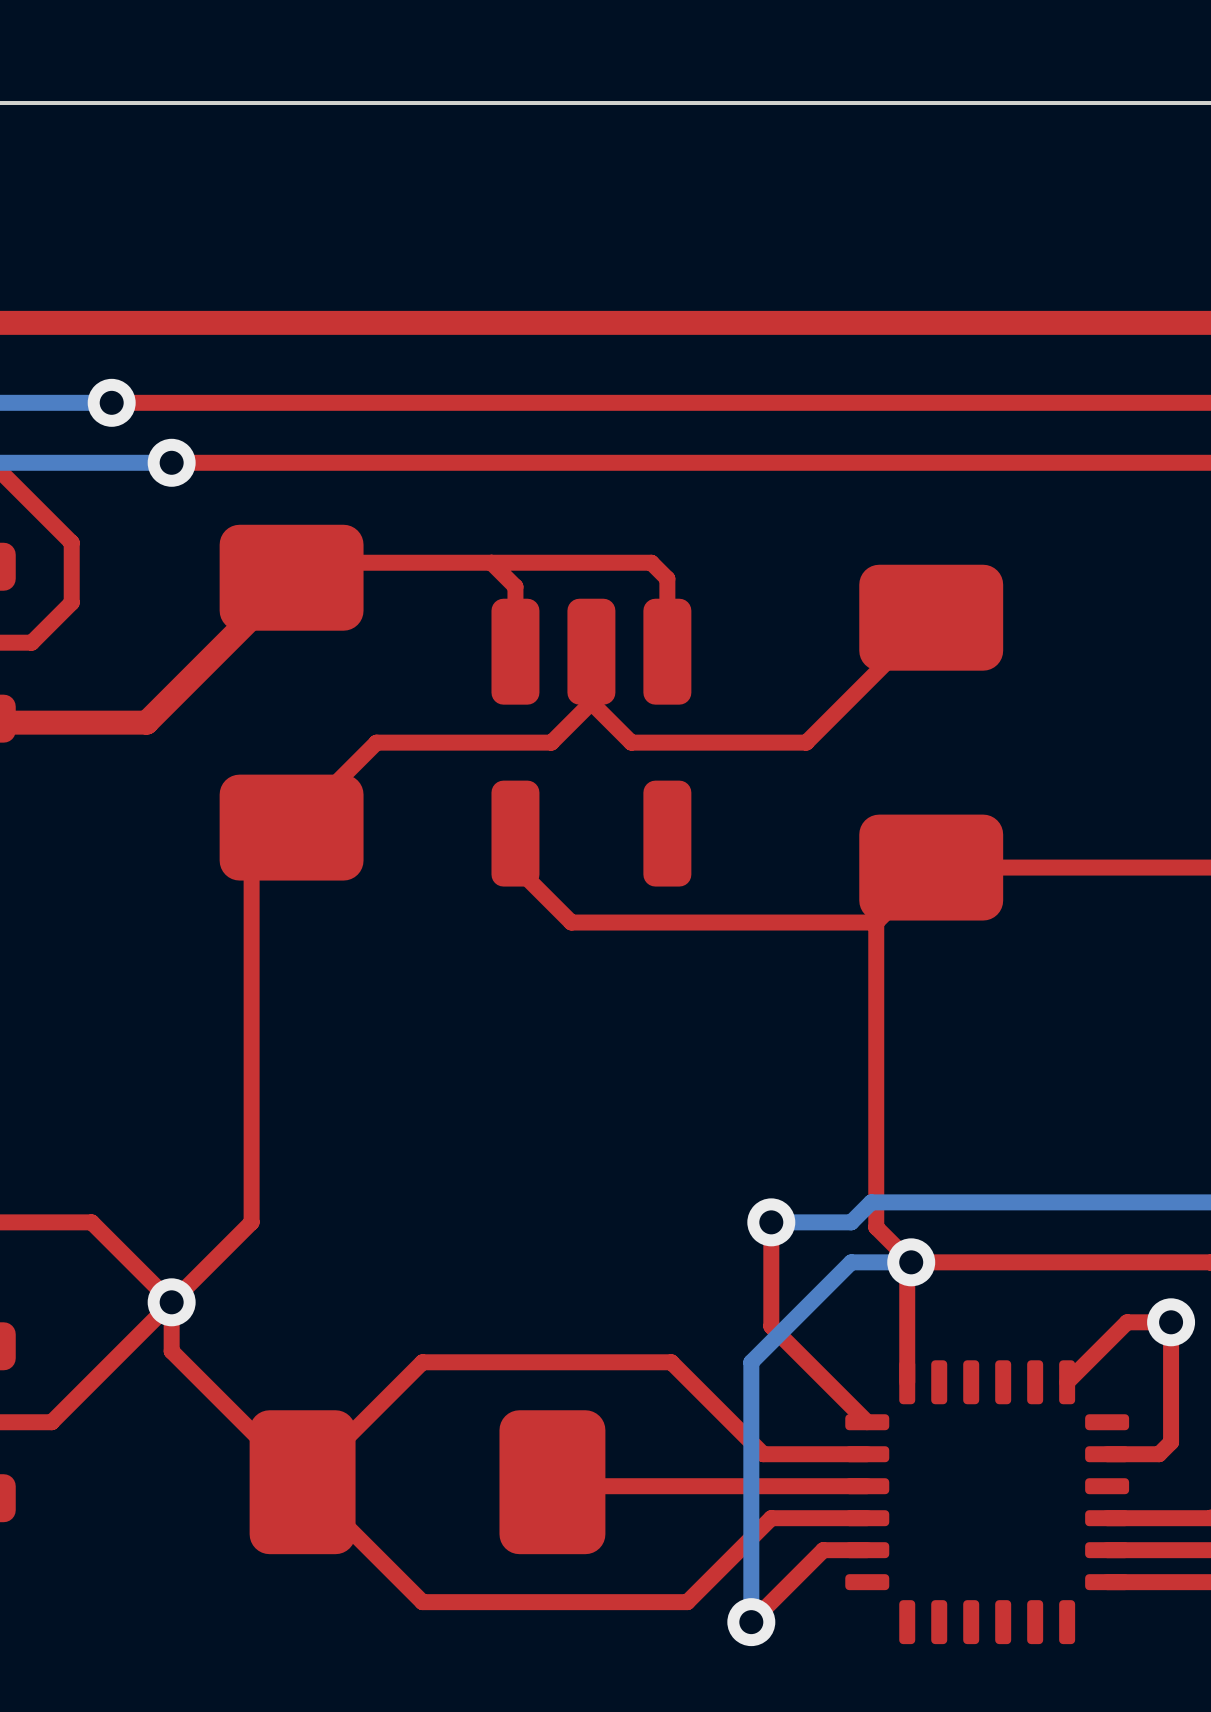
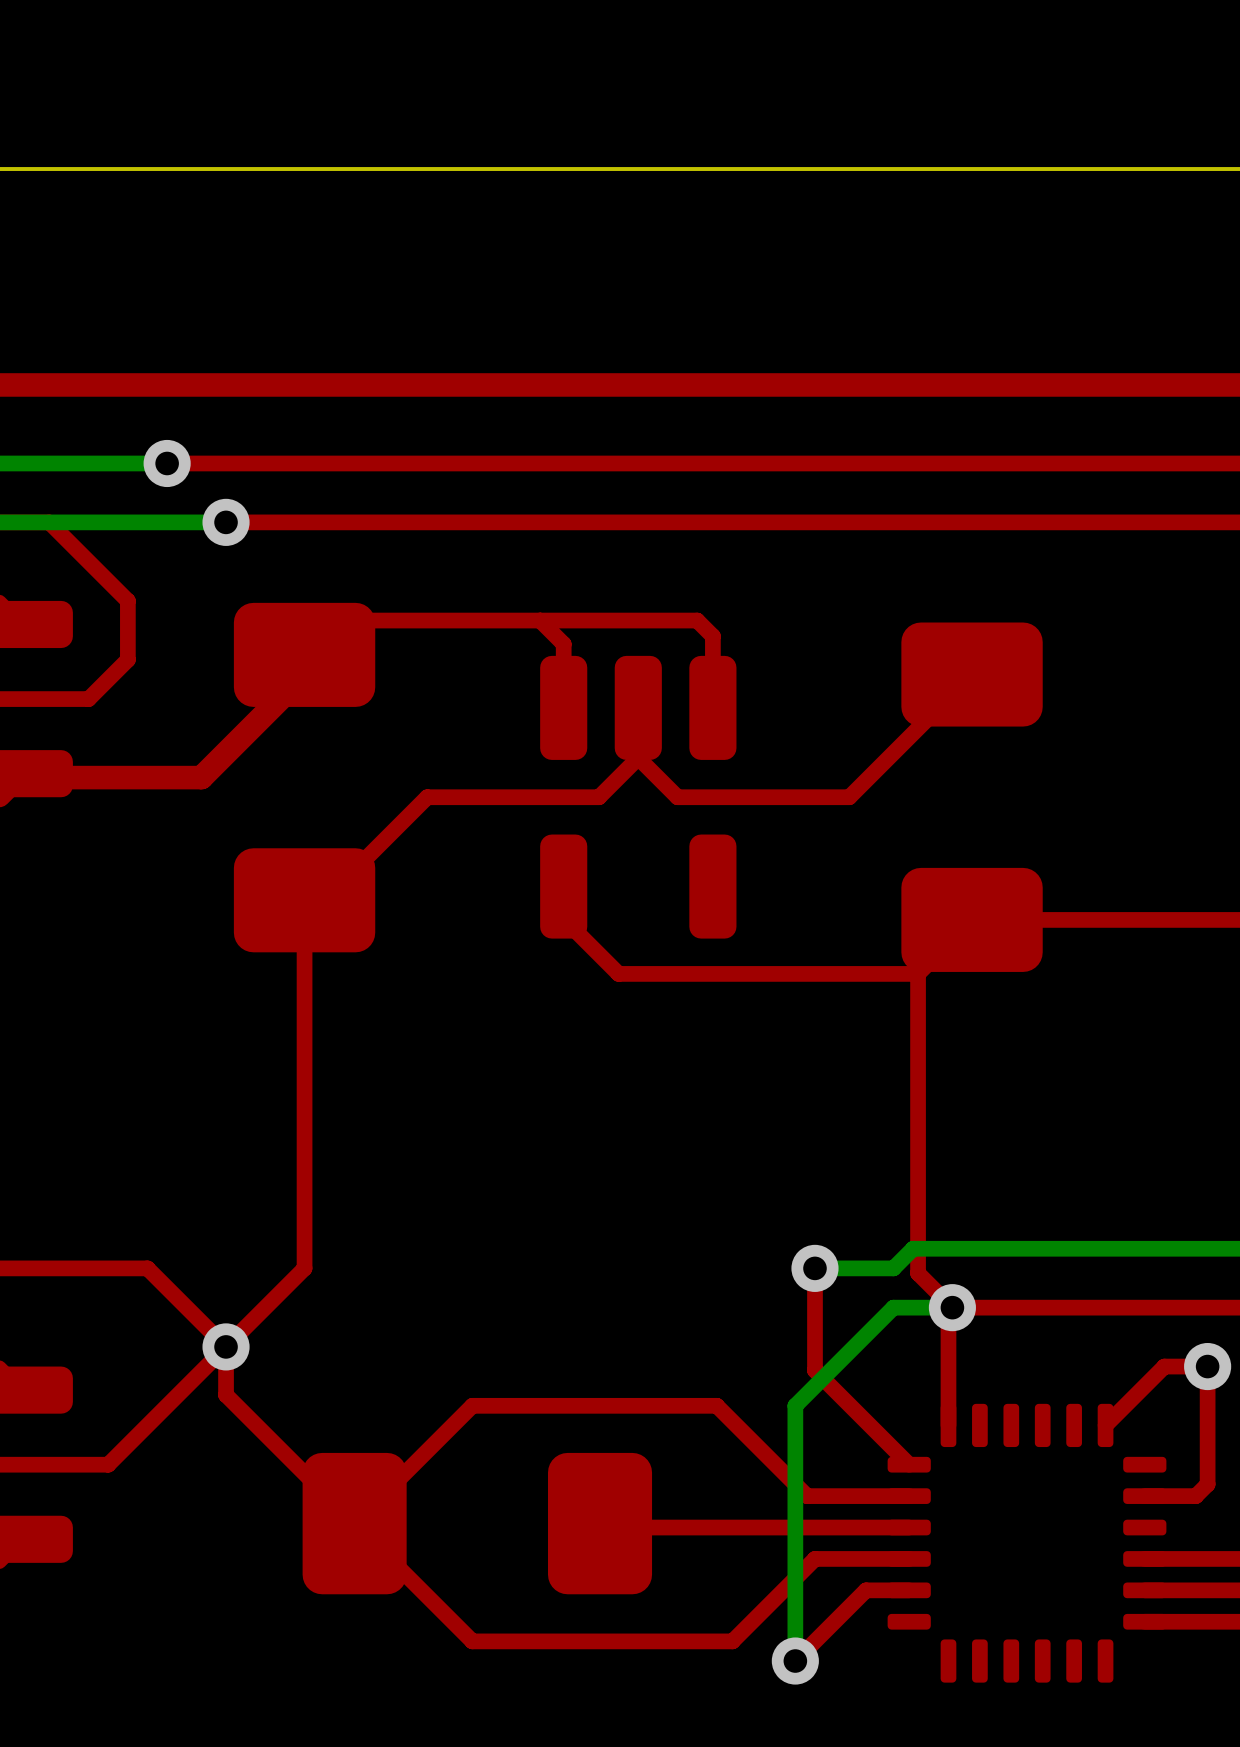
part position: (291, 702) -> (304, 777)

